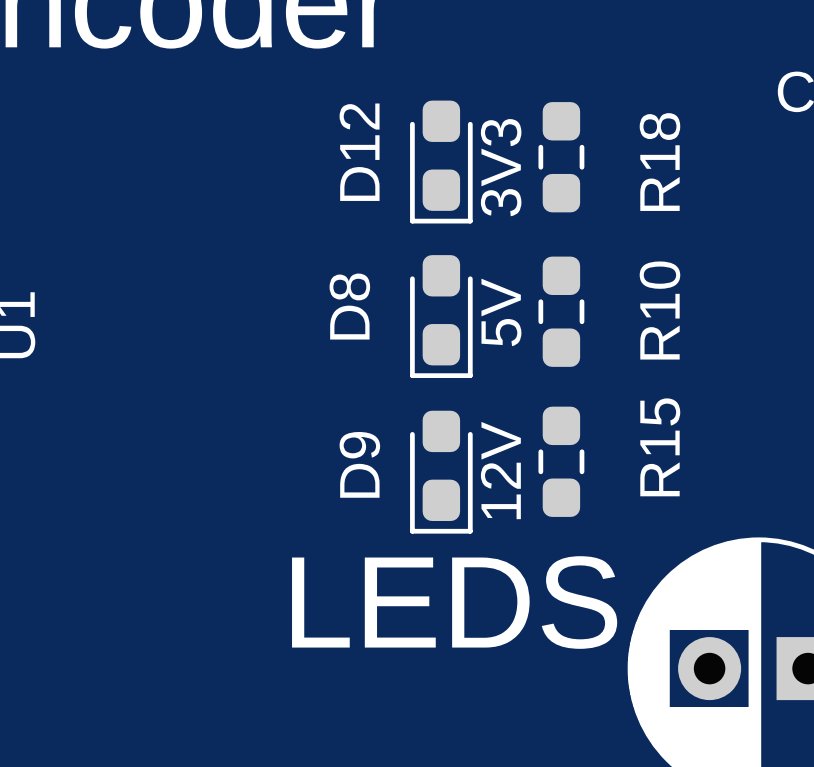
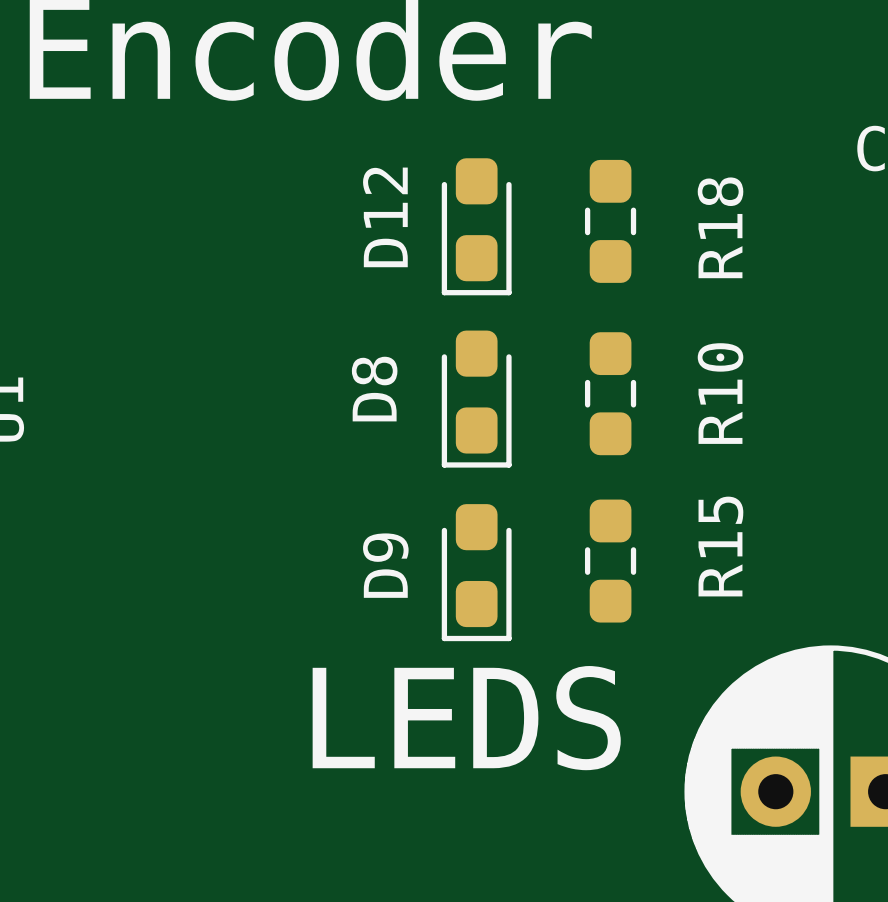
text: 3V3 (501, 167) -> none
text: 5V (501, 312) -> none
text: 12V (500, 470) -> none

